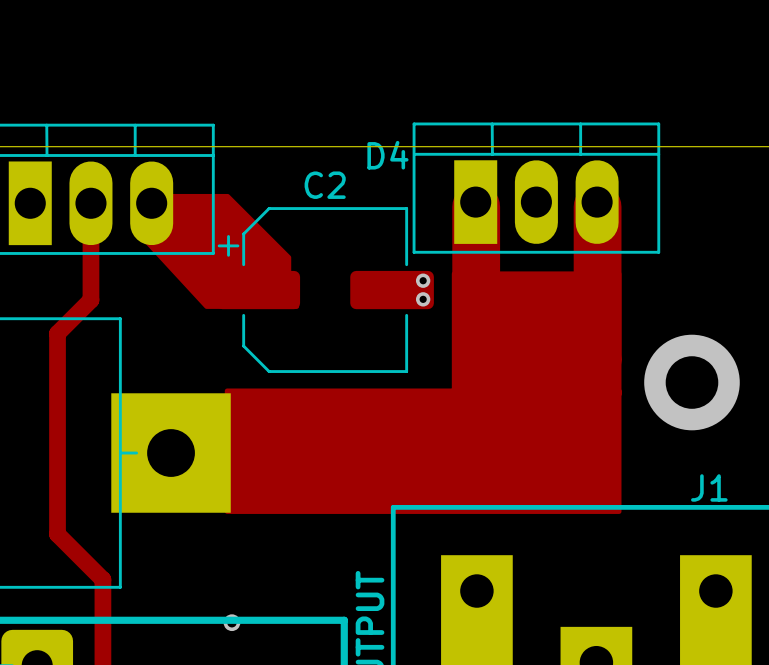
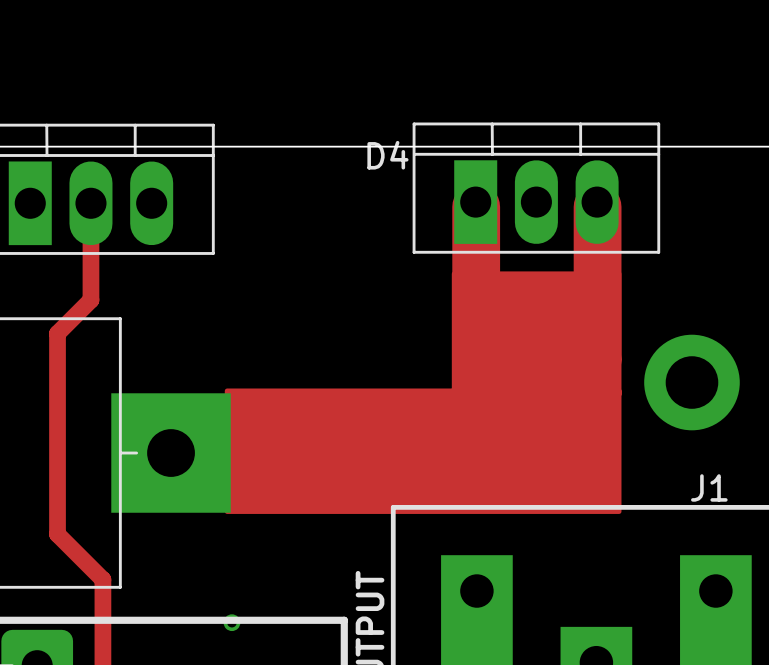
drawing: [134, 193, 300, 309] -> none
via: (423, 280) -> none
C2: (325, 290) -> none
via: (423, 299) -> none

